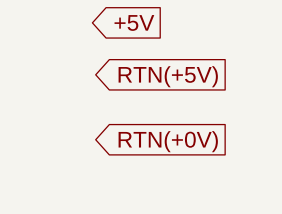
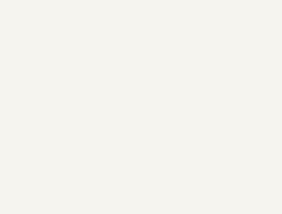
global label: +5V (134, 22) -> none
global label: RTN(+5V) (168, 76) -> none
global label: RTN(+0V) (168, 141) -> none

